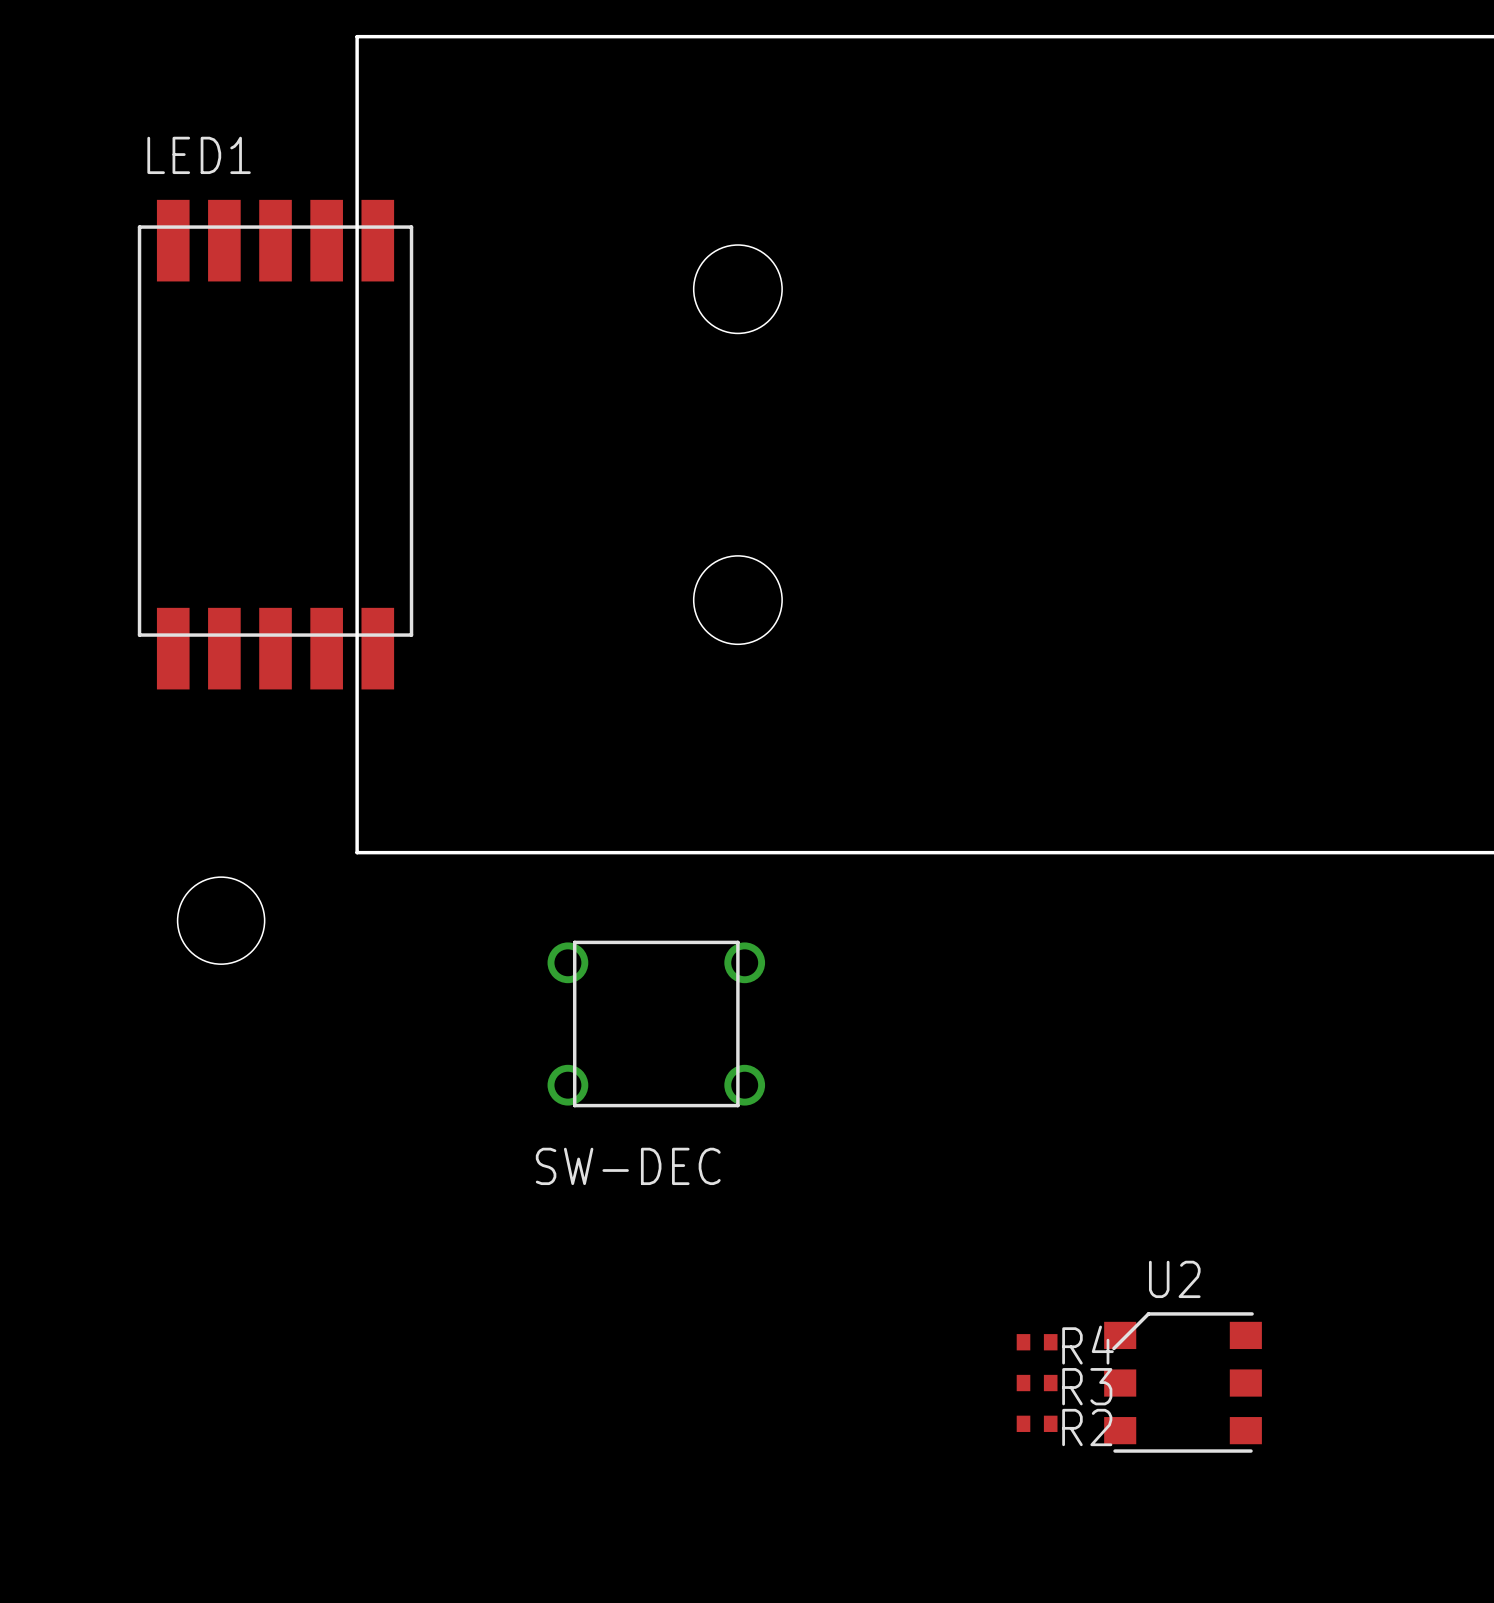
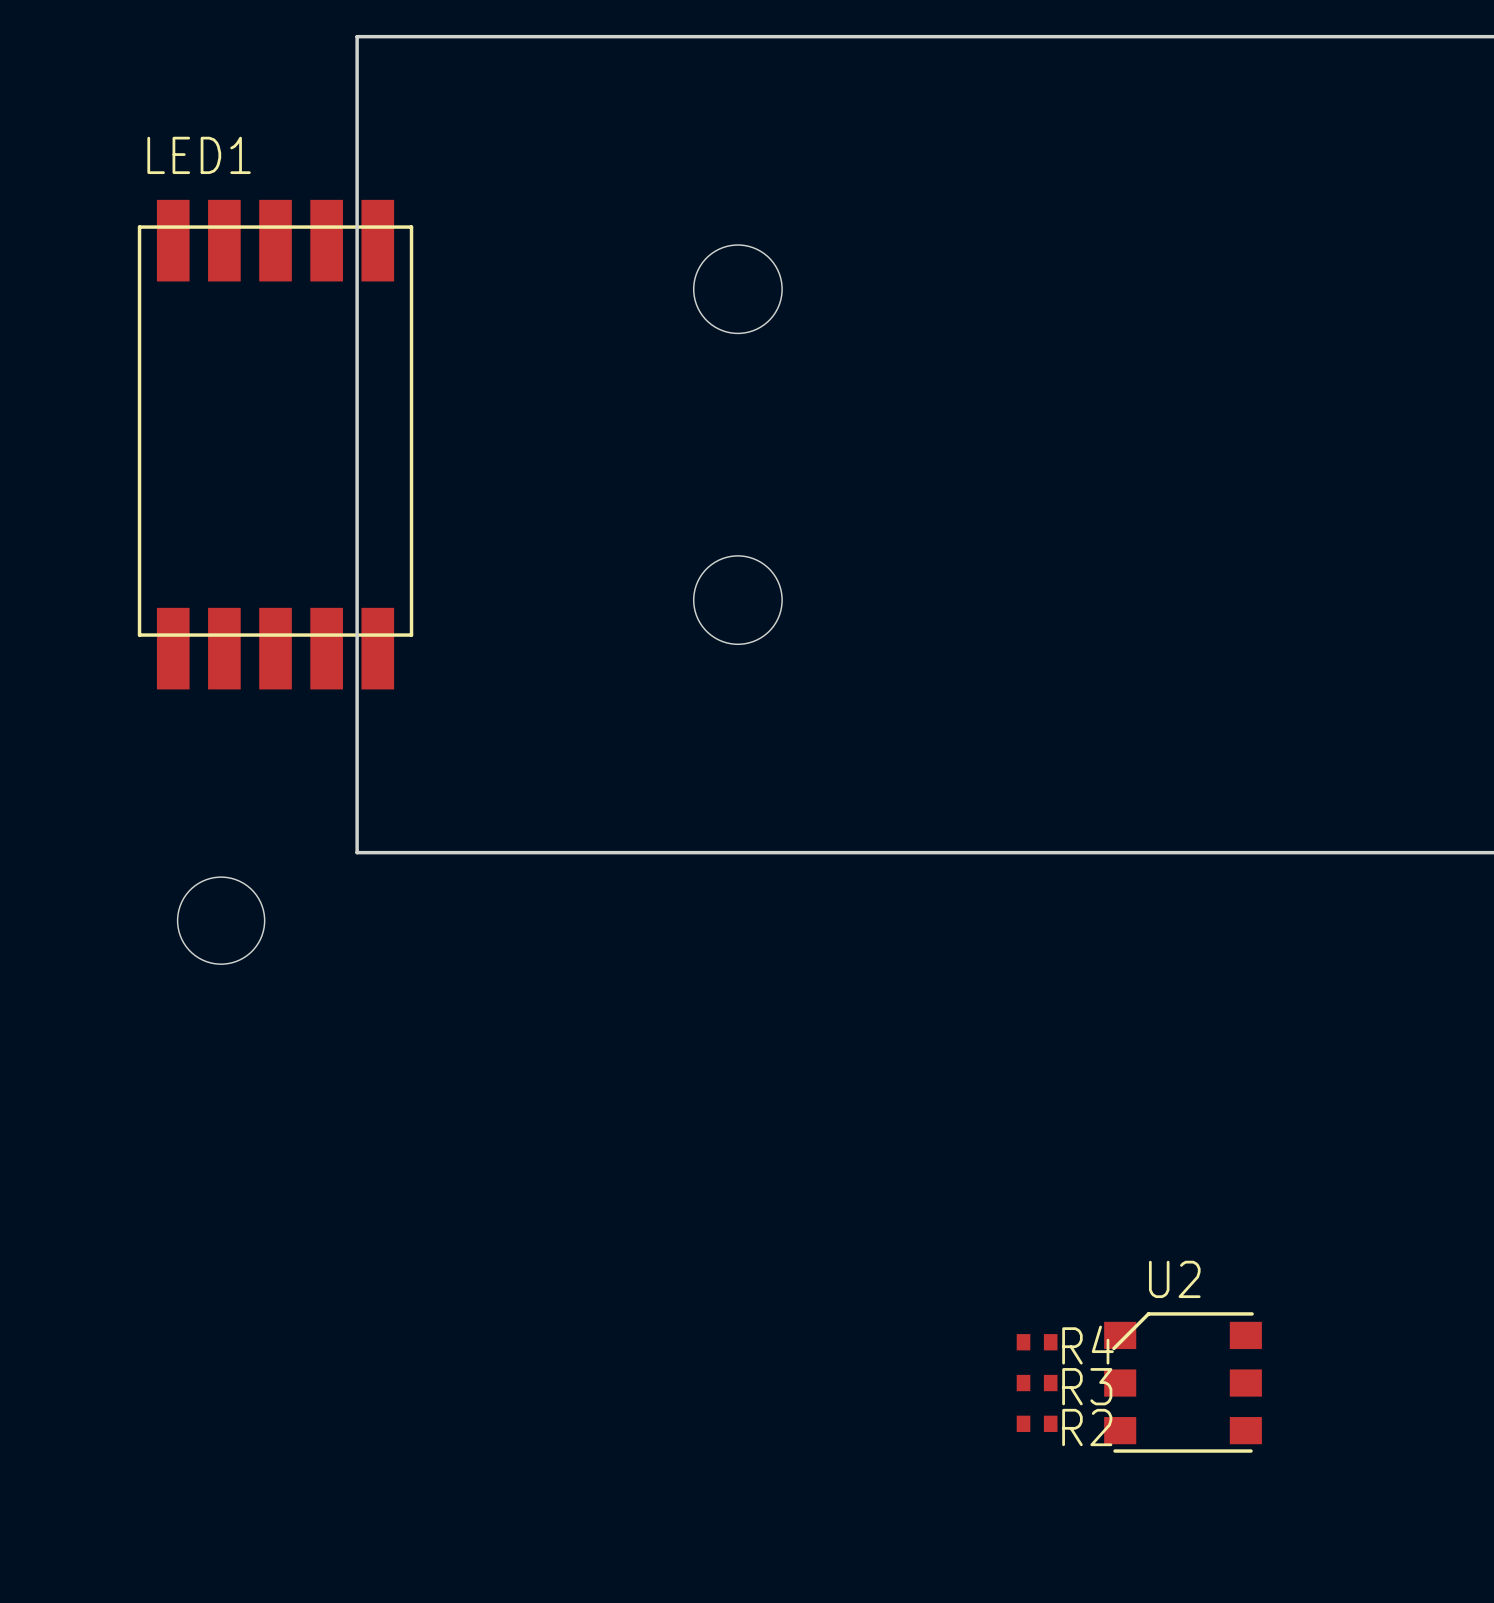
SW-DEC: (656, 1024) -> none

